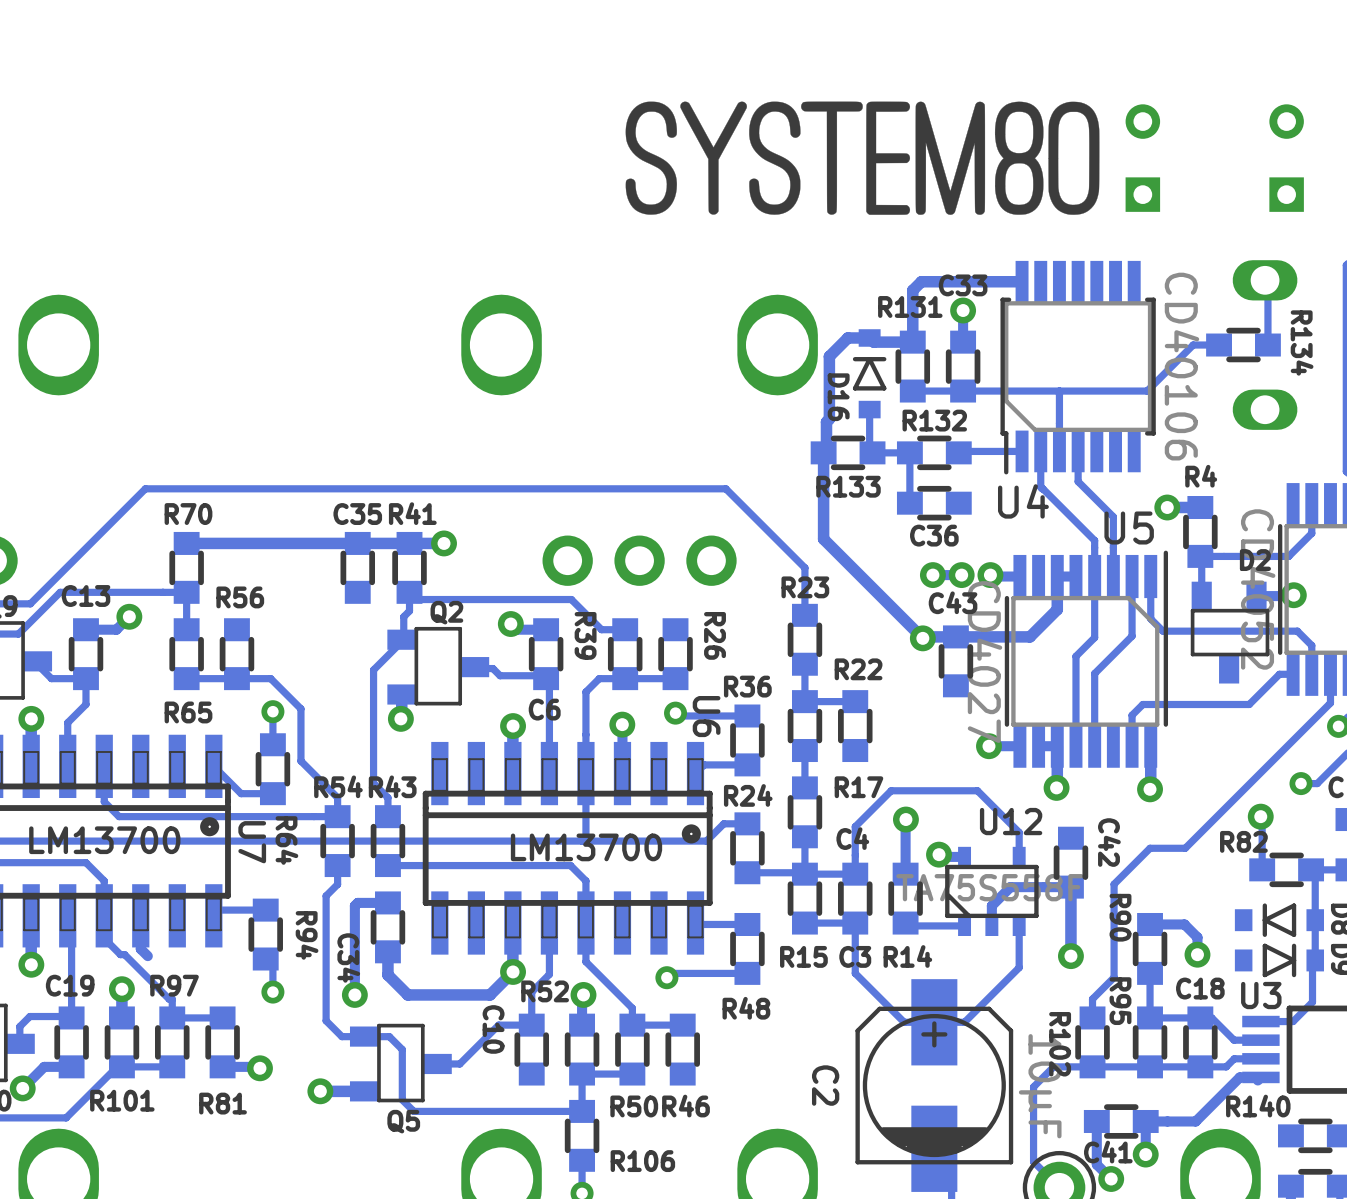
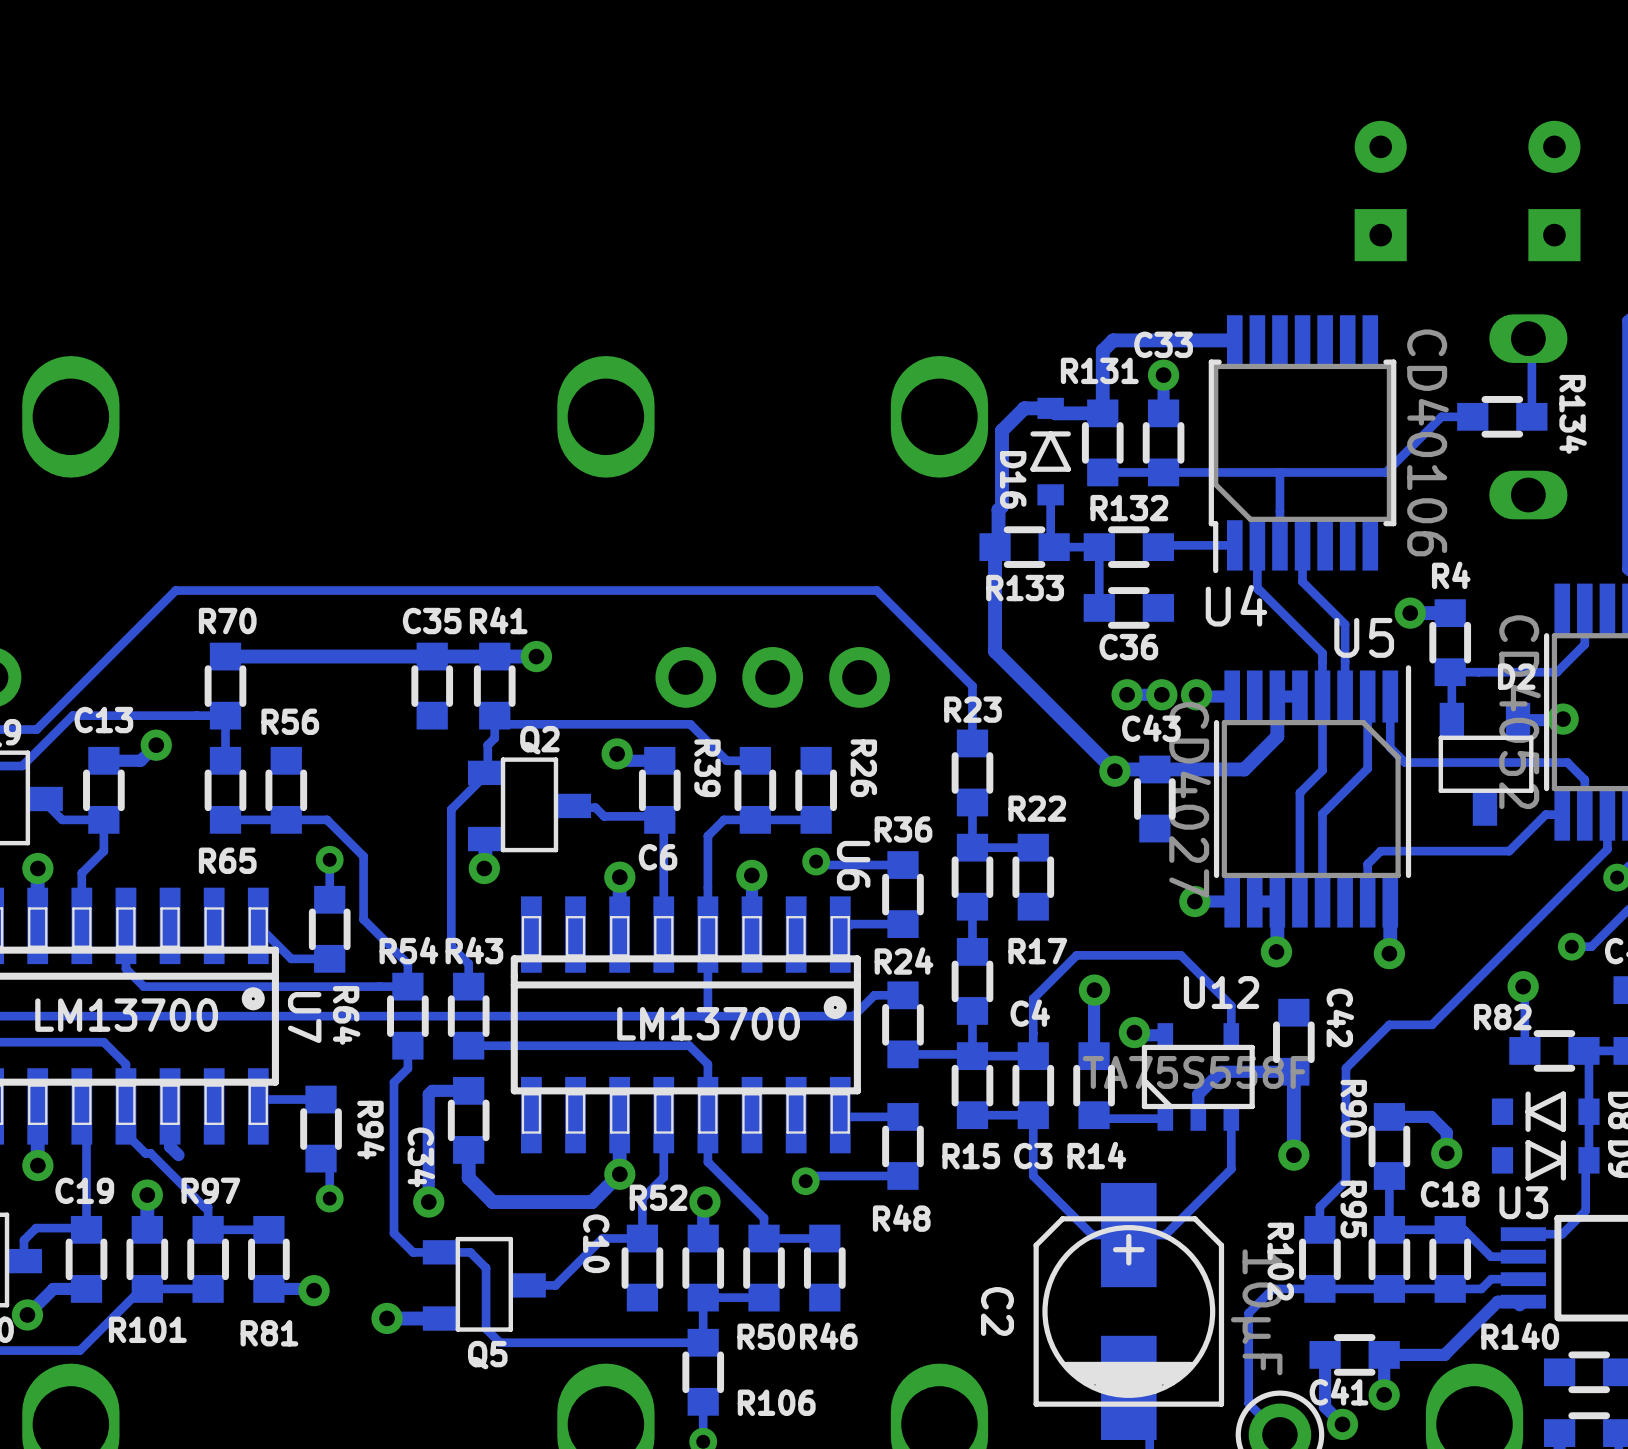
drawing: [625, 101, 1100, 215] -> none
part footprint: [1125, 104, 1161, 212] -> [1354, 120, 1407, 262]
part footprint: [1269, 104, 1304, 212] -> [1528, 120, 1581, 262]

